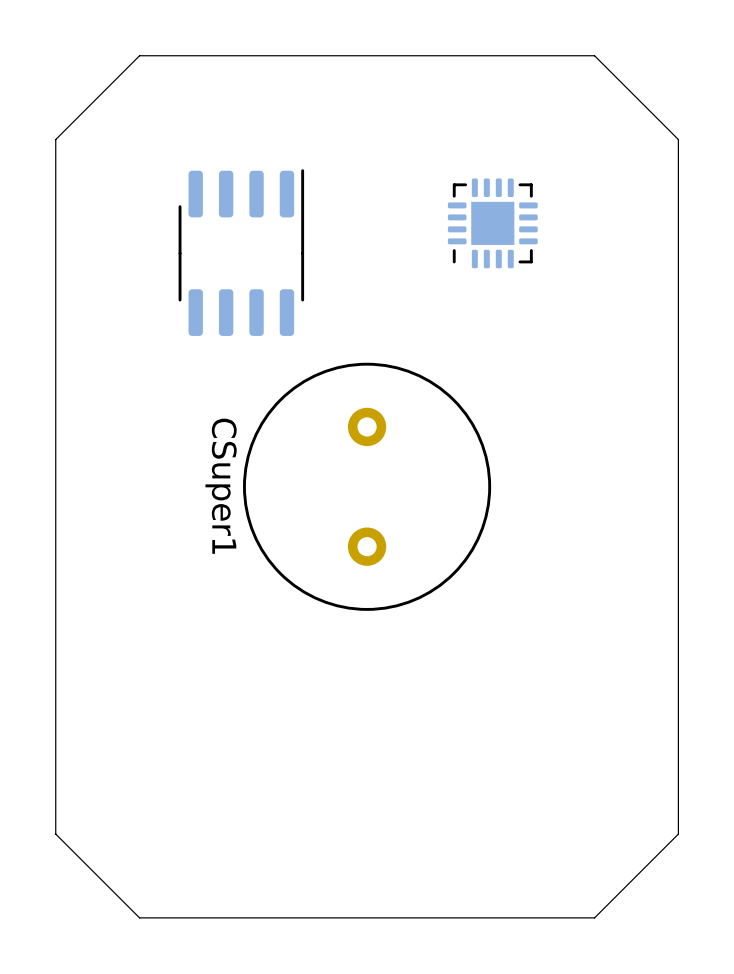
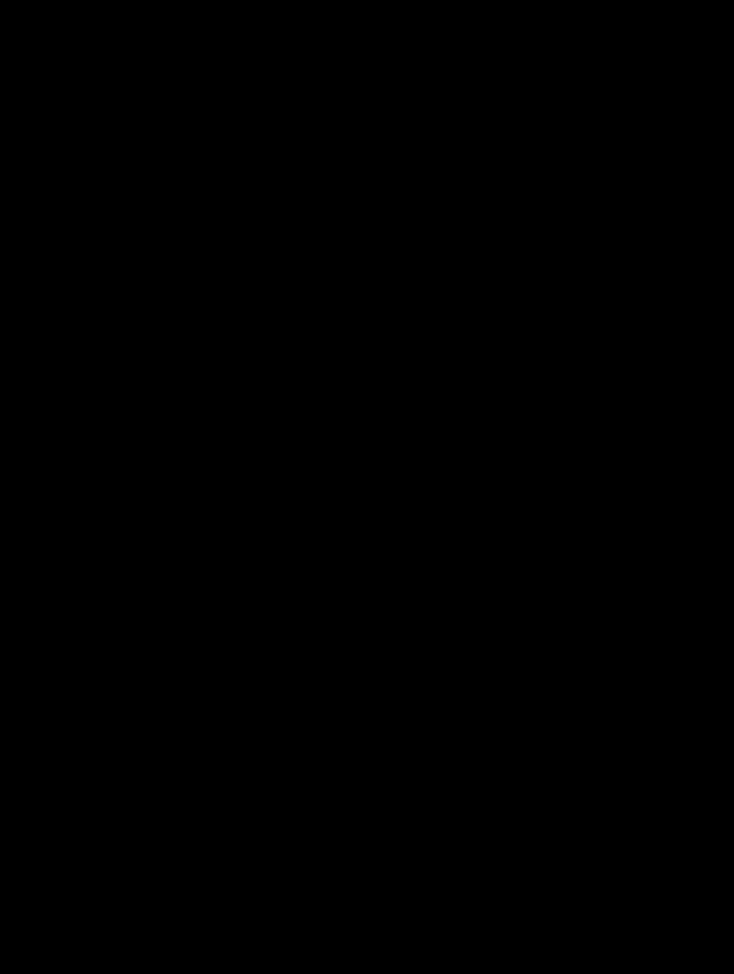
board edge: (594, 55) (139, 55) (55, 139) (55, 834) (139, 917) (594, 917) (678, 834) (678, 139) (594, 55) -> none
part: (492, 223) -> none
part: (241, 252) -> none
CSuper1: (367, 486) -> none

